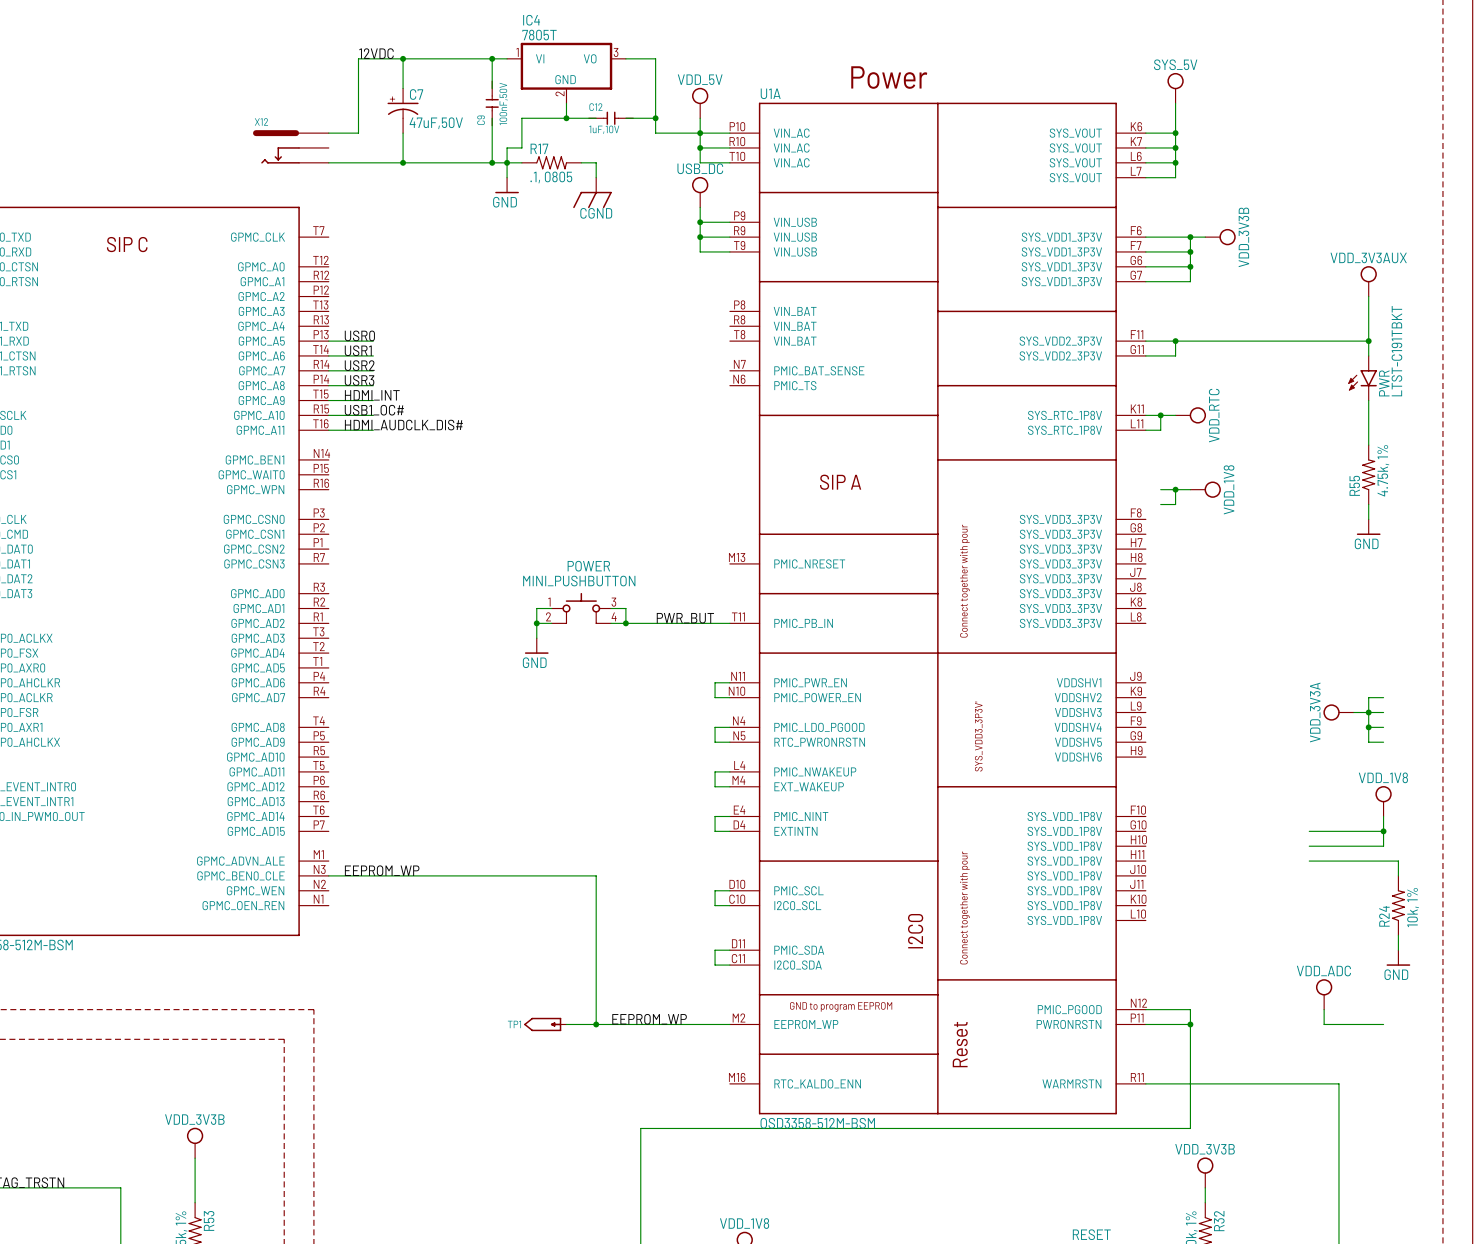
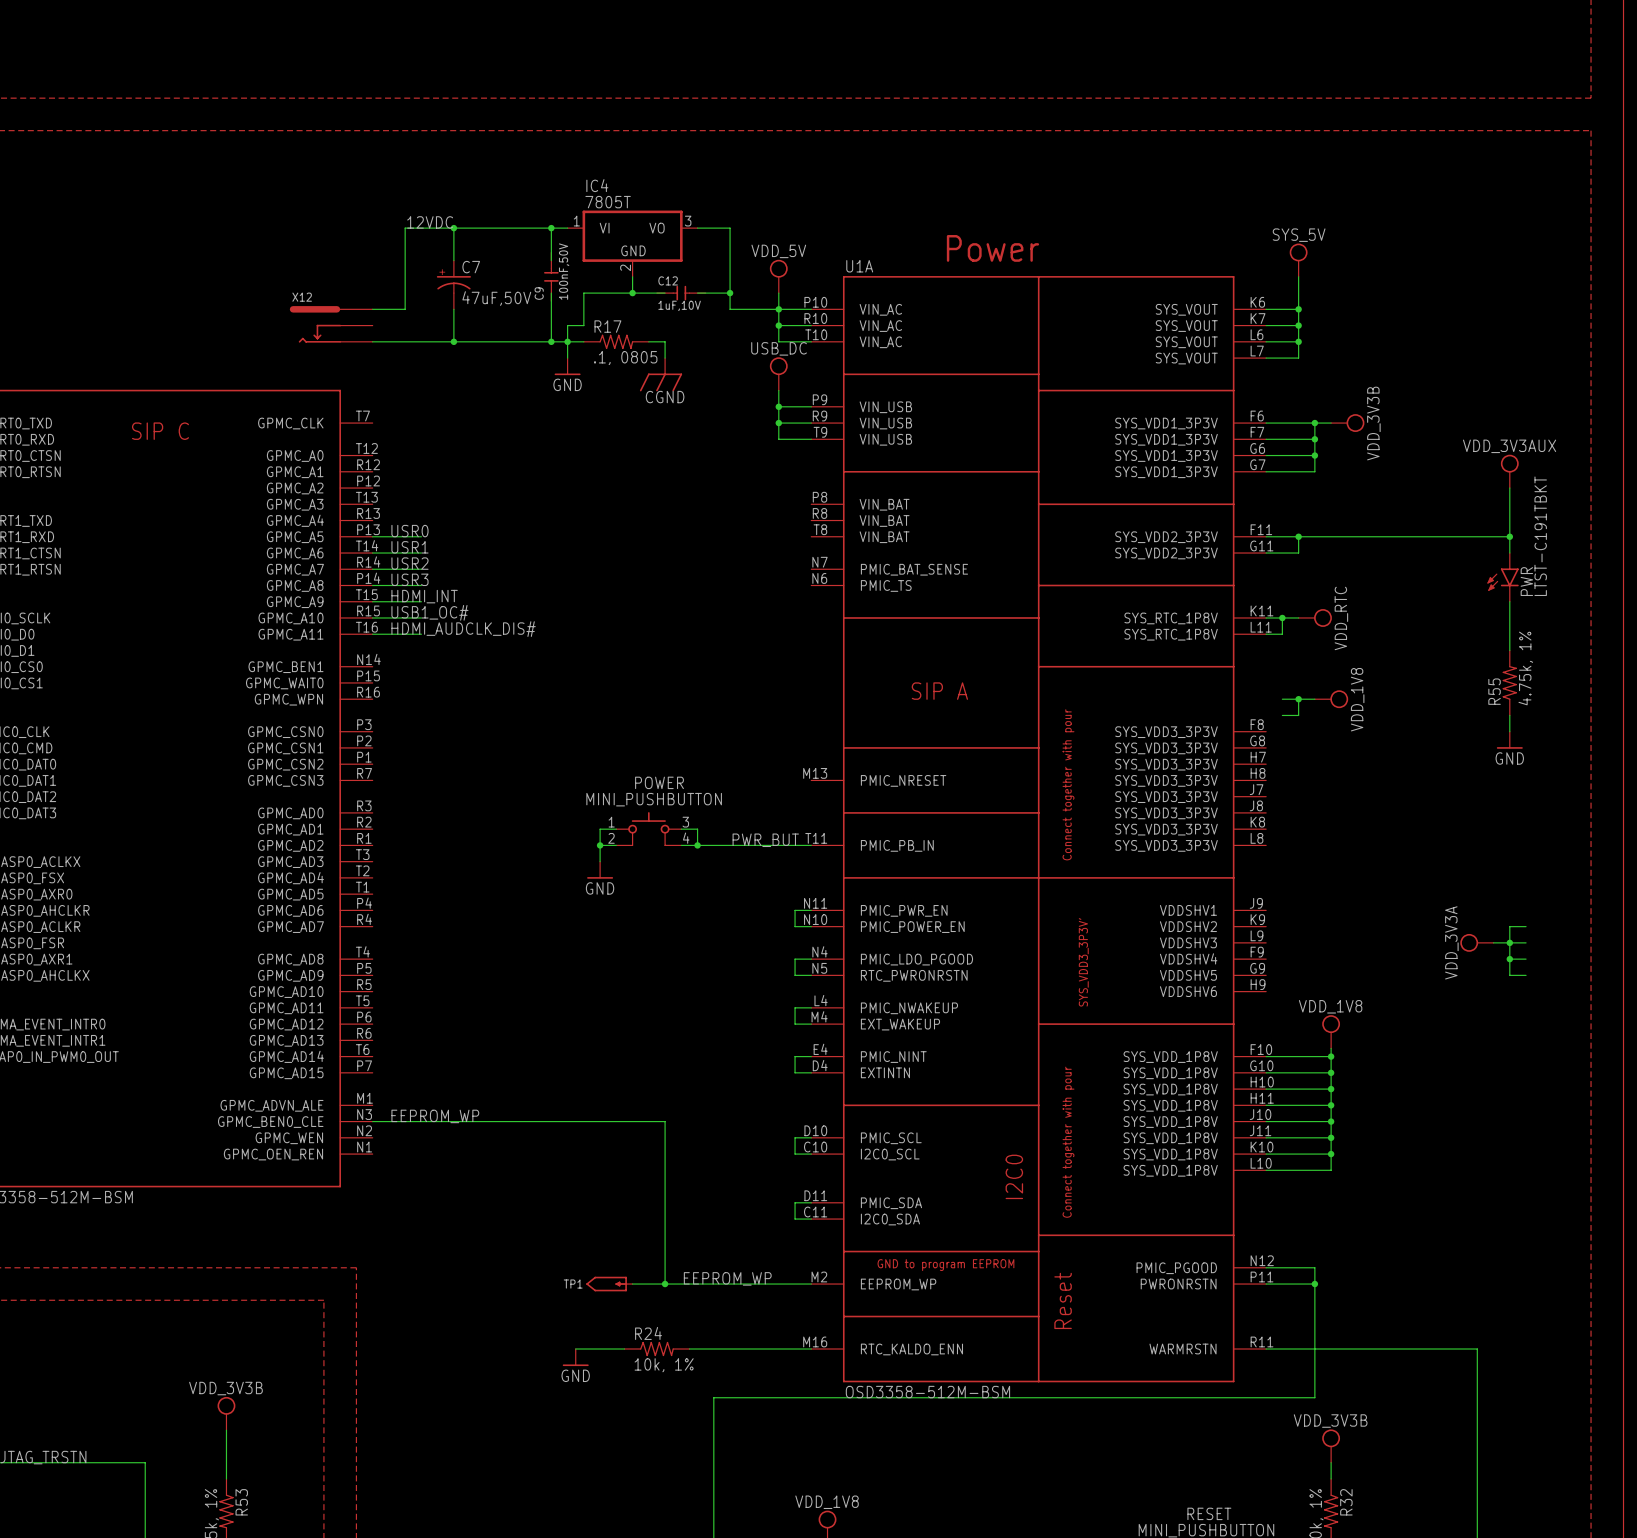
power symbol: none -> VDD_1V8 (1331, 1031)
power symbol: VDD_1V8 (1383, 801) -> none
wire: none -> (1331, 1048) (1331, 1170) (1266, 1170)
wire: none -> (1266, 1056) (1331, 1056)
junction: none -> (1331, 1056)
wire: (1383, 816) (1383, 846) (1309, 846) -> none
wire: none -> (1266, 1072) (1331, 1072)
junction: none -> (1331, 1072)
wire: (1309, 831) (1383, 831) -> none
junction: (1383, 831) -> none
wire: none -> (1266, 1089) (1331, 1089)
junction: none -> (1331, 1089)
wire: none -> (1266, 1105) (1331, 1105)
junction: none -> (1331, 1105)
wire: (1309, 861) (1398, 861) (1398, 875) -> none
wire: none -> (1266, 1121) (1331, 1121)
junction: none -> (1331, 1121)
wire: none -> (1266, 1137) (1331, 1137)
junction: none -> (1331, 1137)
wire: none -> (1266, 1154) (1331, 1154)
junction: none -> (1331, 1154)
R24 rotation: 0° (1398, 905) -> 90° clockwise (656, 1349)
R24 position: (1398, 905) -> (656, 1349)
wire: (1398, 935) (1398, 950) -> none
power symbol: GND (1398, 958) -> none
power symbol: VDD_ADC (1324, 994) -> none
wire: (1324, 1009) (1324, 1024) (1383, 1024) -> none
wire: none -> (575, 1349) (624, 1349)
wire: none -> (689, 1349) (811, 1349)
power symbol: none -> GND (575, 1357)

